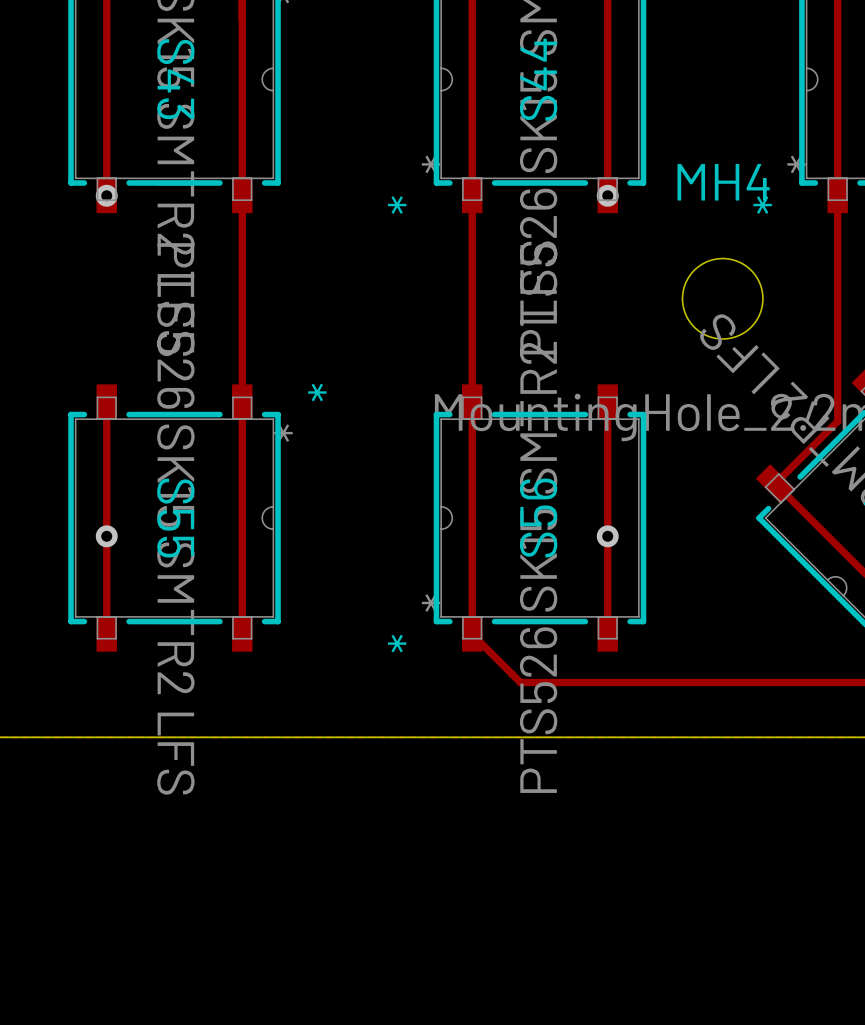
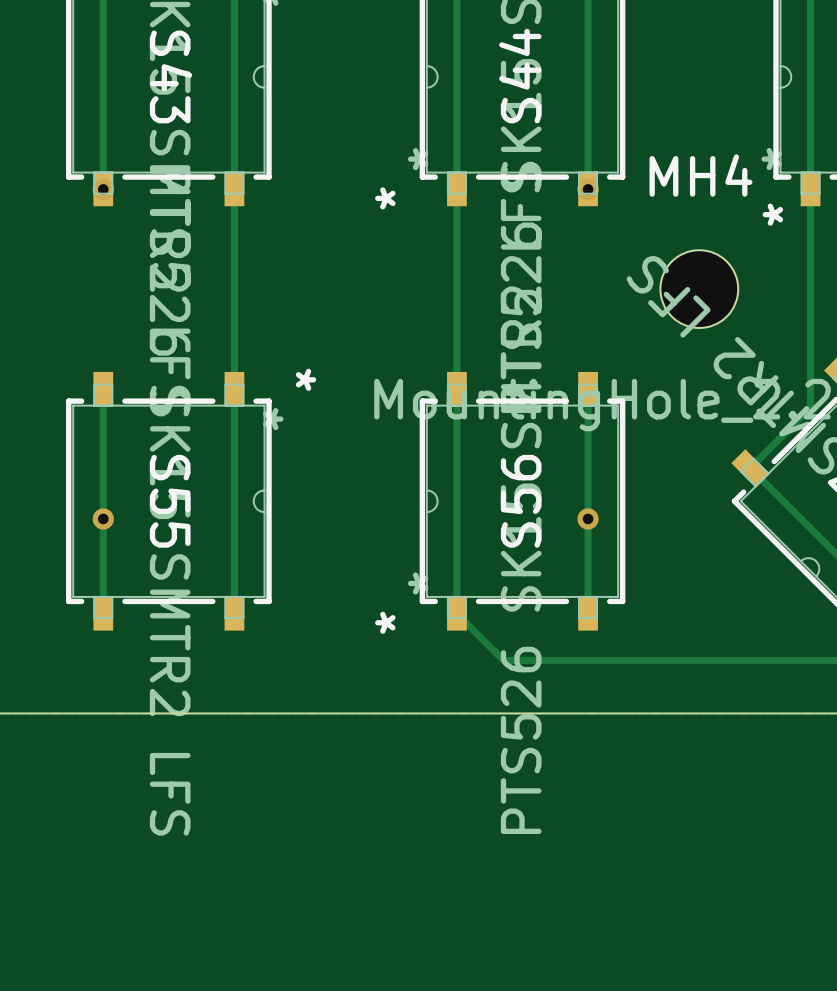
part text position: * (762, 205) -> * (772, 214)

